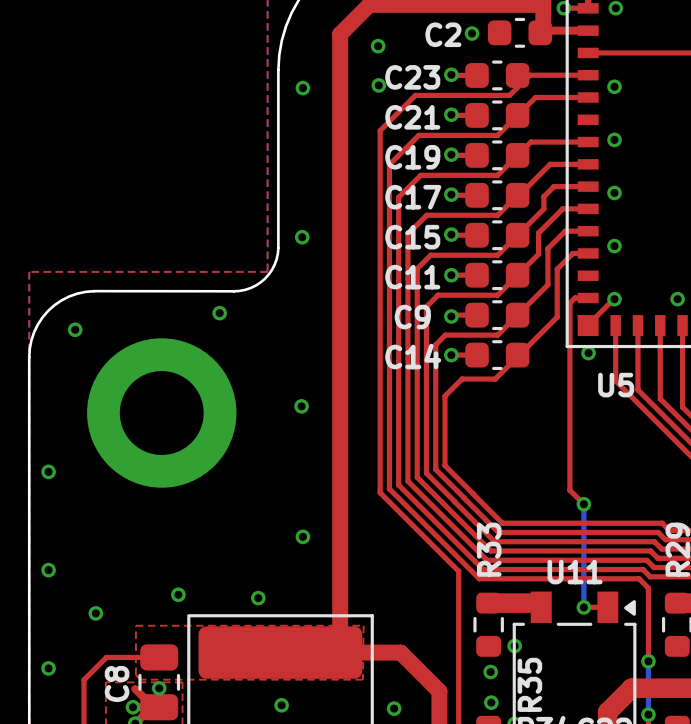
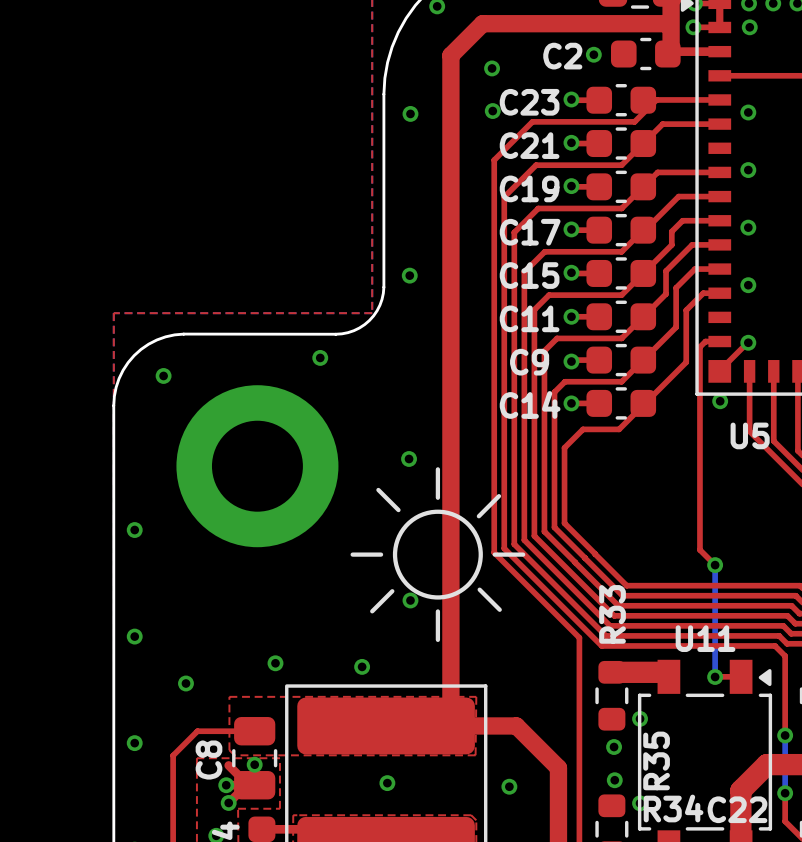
line: none -> (437, 469) (437, 497)
line: none -> (378, 489) (398, 510)
line: none -> (498, 496) (478, 516)
drawing: none -> [392, 509, 483, 600]
line: none -> (352, 554) (381, 554)
line: none -> (494, 554) (523, 554)
line: none -> (479, 589) (499, 609)
line: none -> (392, 591) (372, 611)
line: none -> (437, 611) (437, 639)

